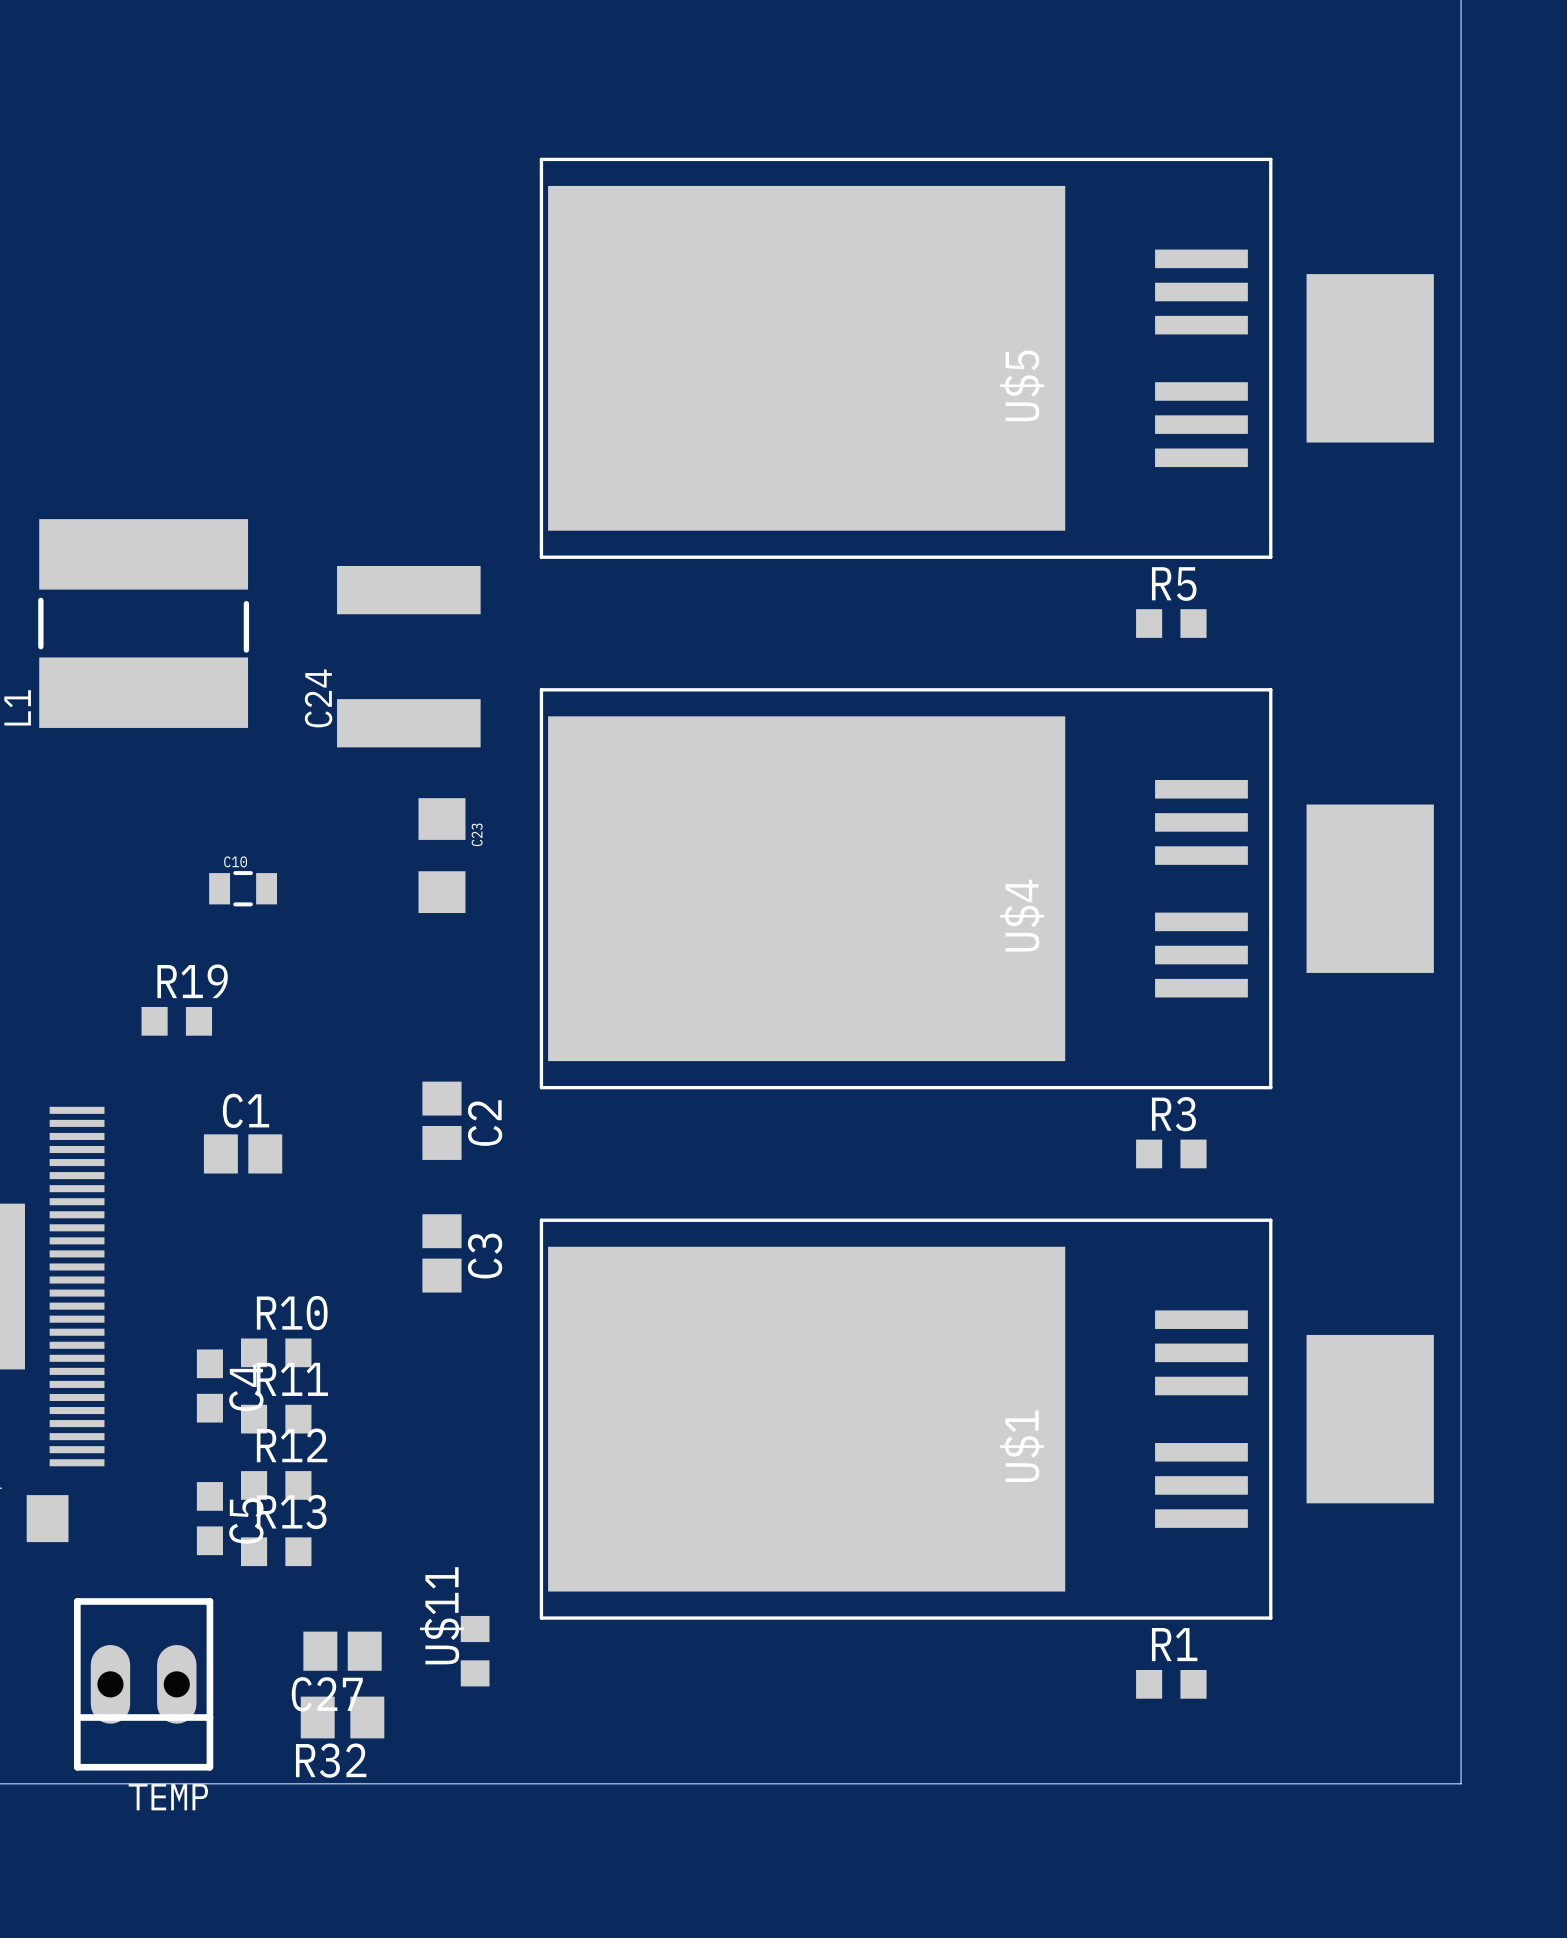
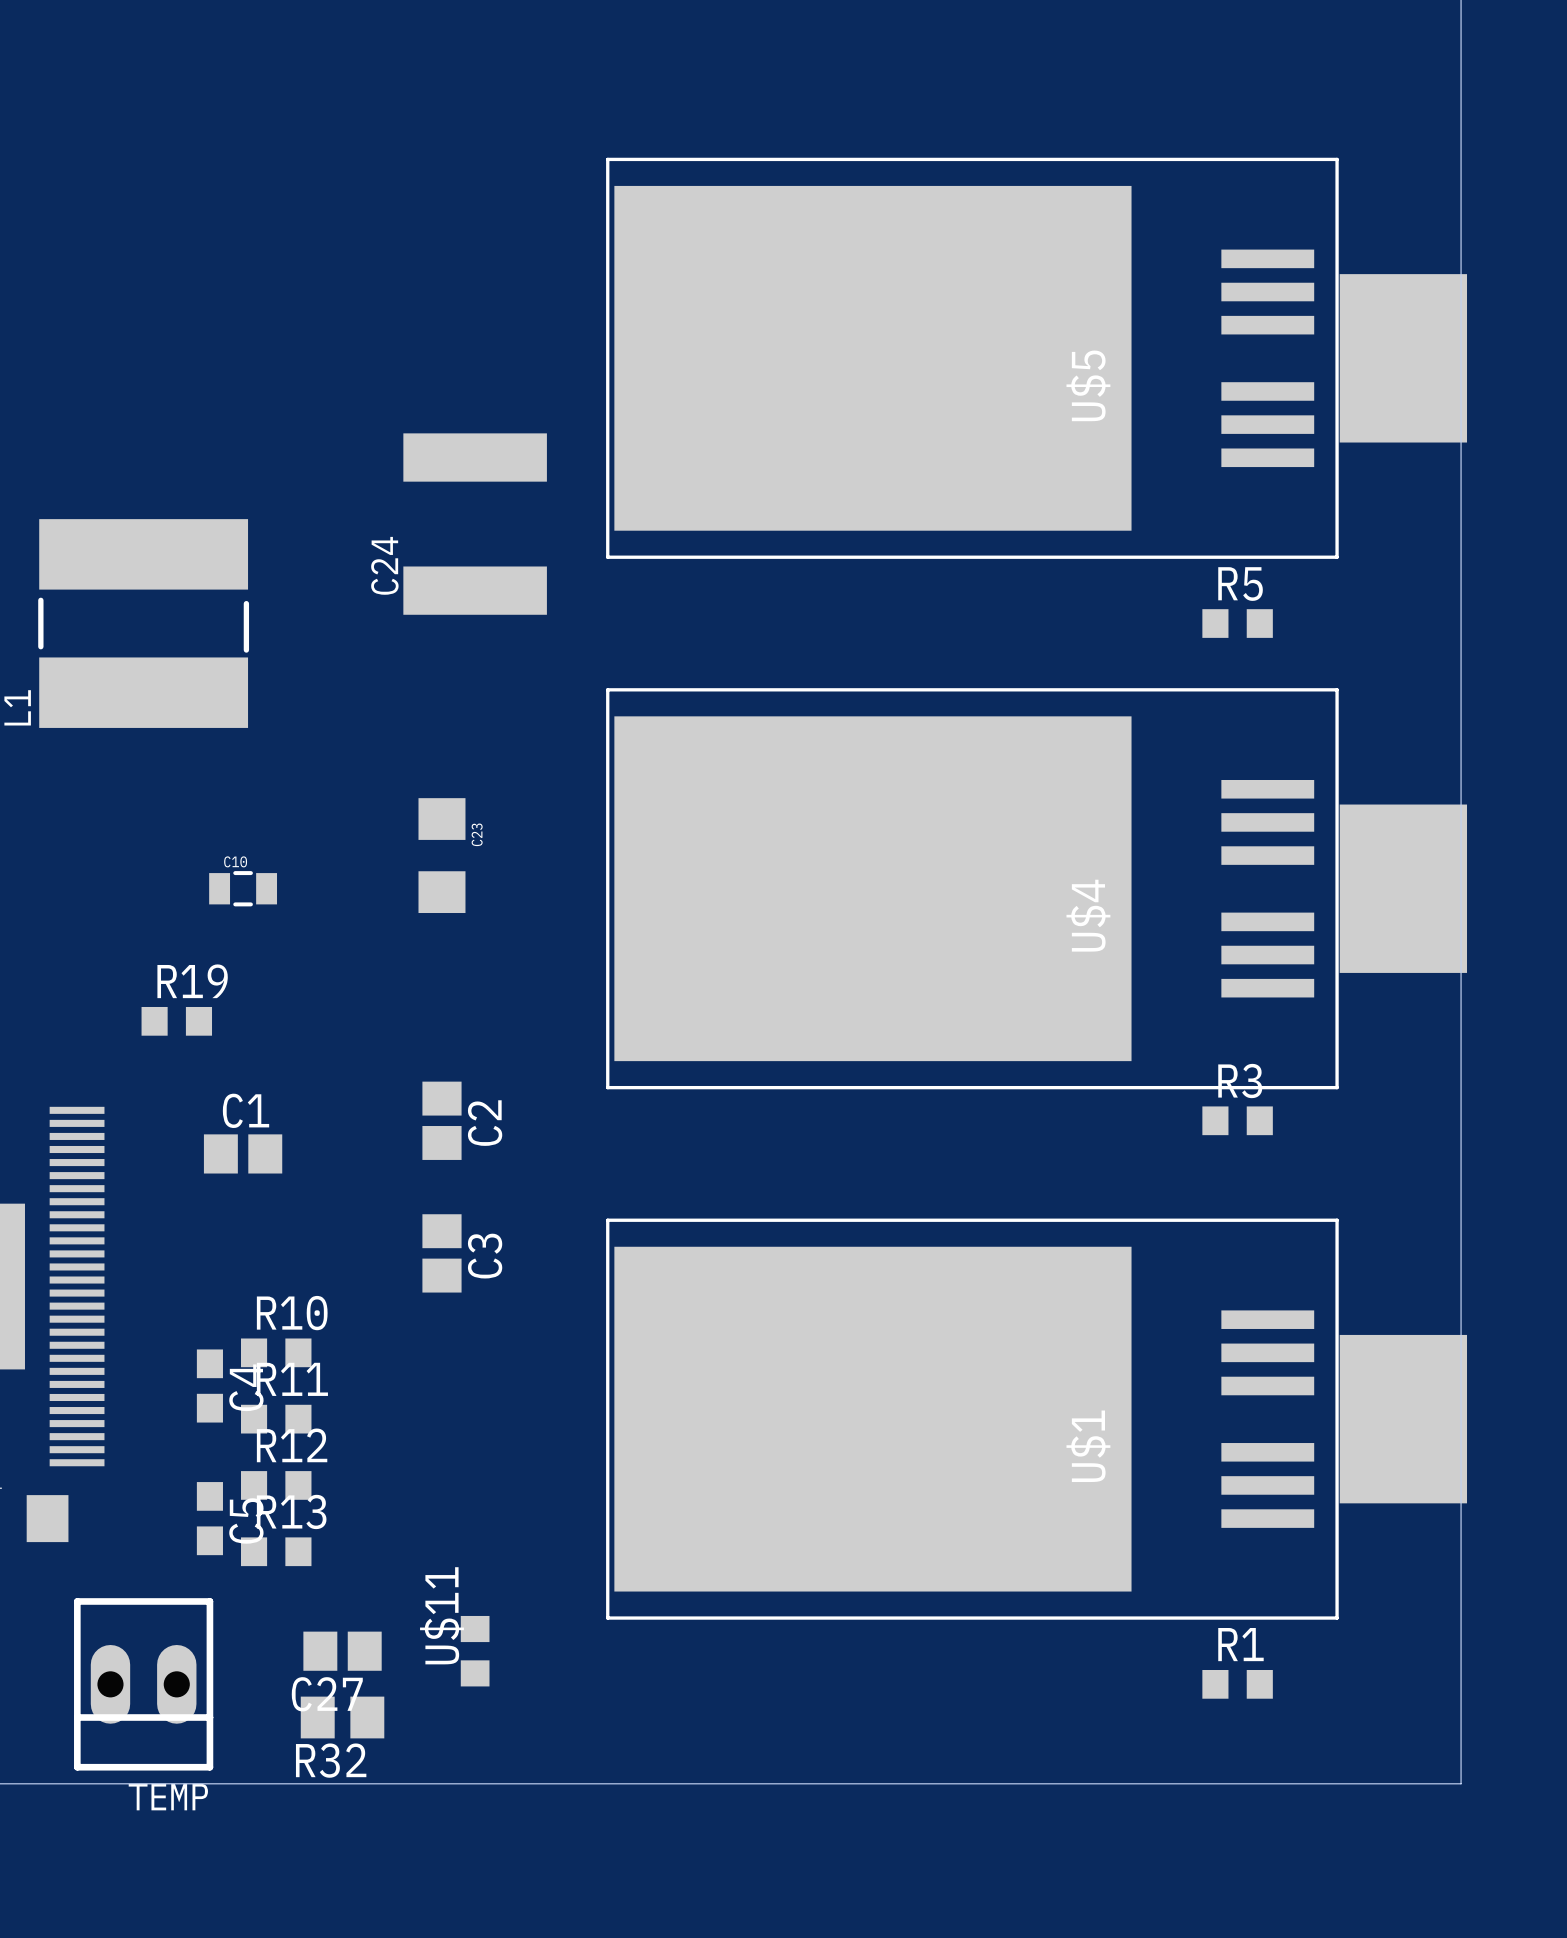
part position: (906, 358) -> (972, 358)
part position: (1370, 358) -> (1403, 358)
R5 position: (1171, 623) -> (1237, 623)
C24 position: (408, 656) -> (475, 524)
part position: (906, 888) -> (972, 888)
part position: (1370, 888) -> (1403, 888)
R3 position: (1171, 1153) -> (1237, 1120)
part position: (906, 1419) -> (972, 1419)
part position: (1370, 1419) -> (1403, 1419)
R1 position: (1171, 1684) -> (1237, 1684)

